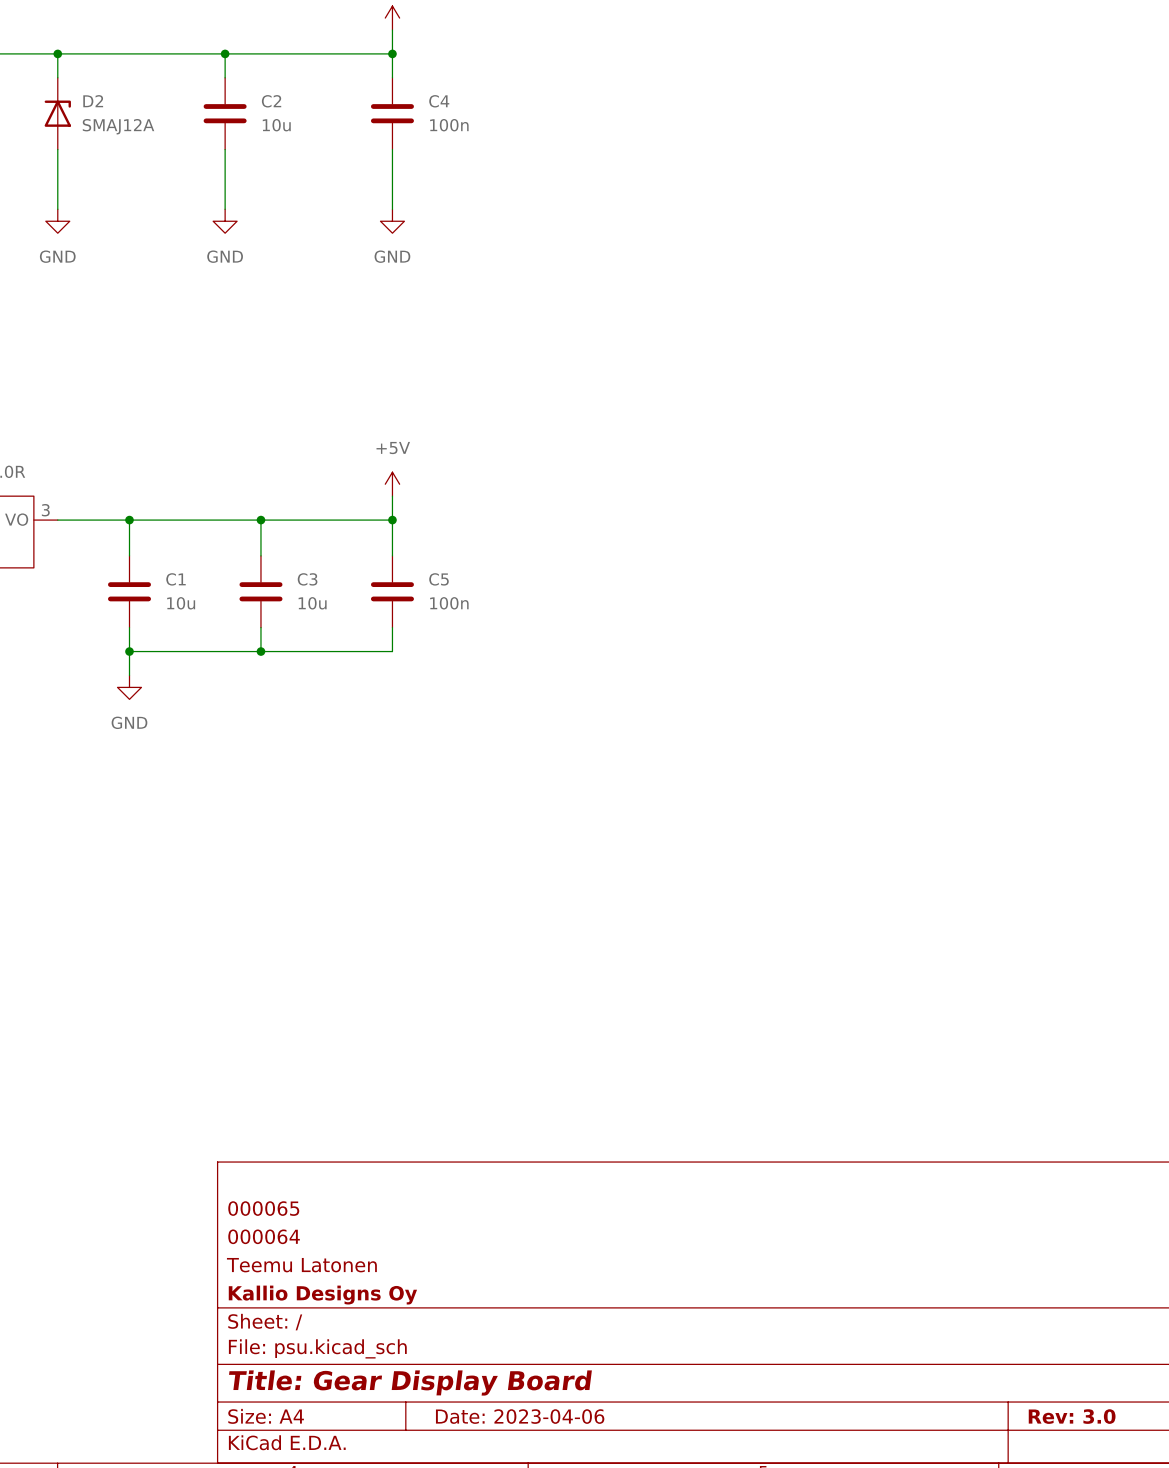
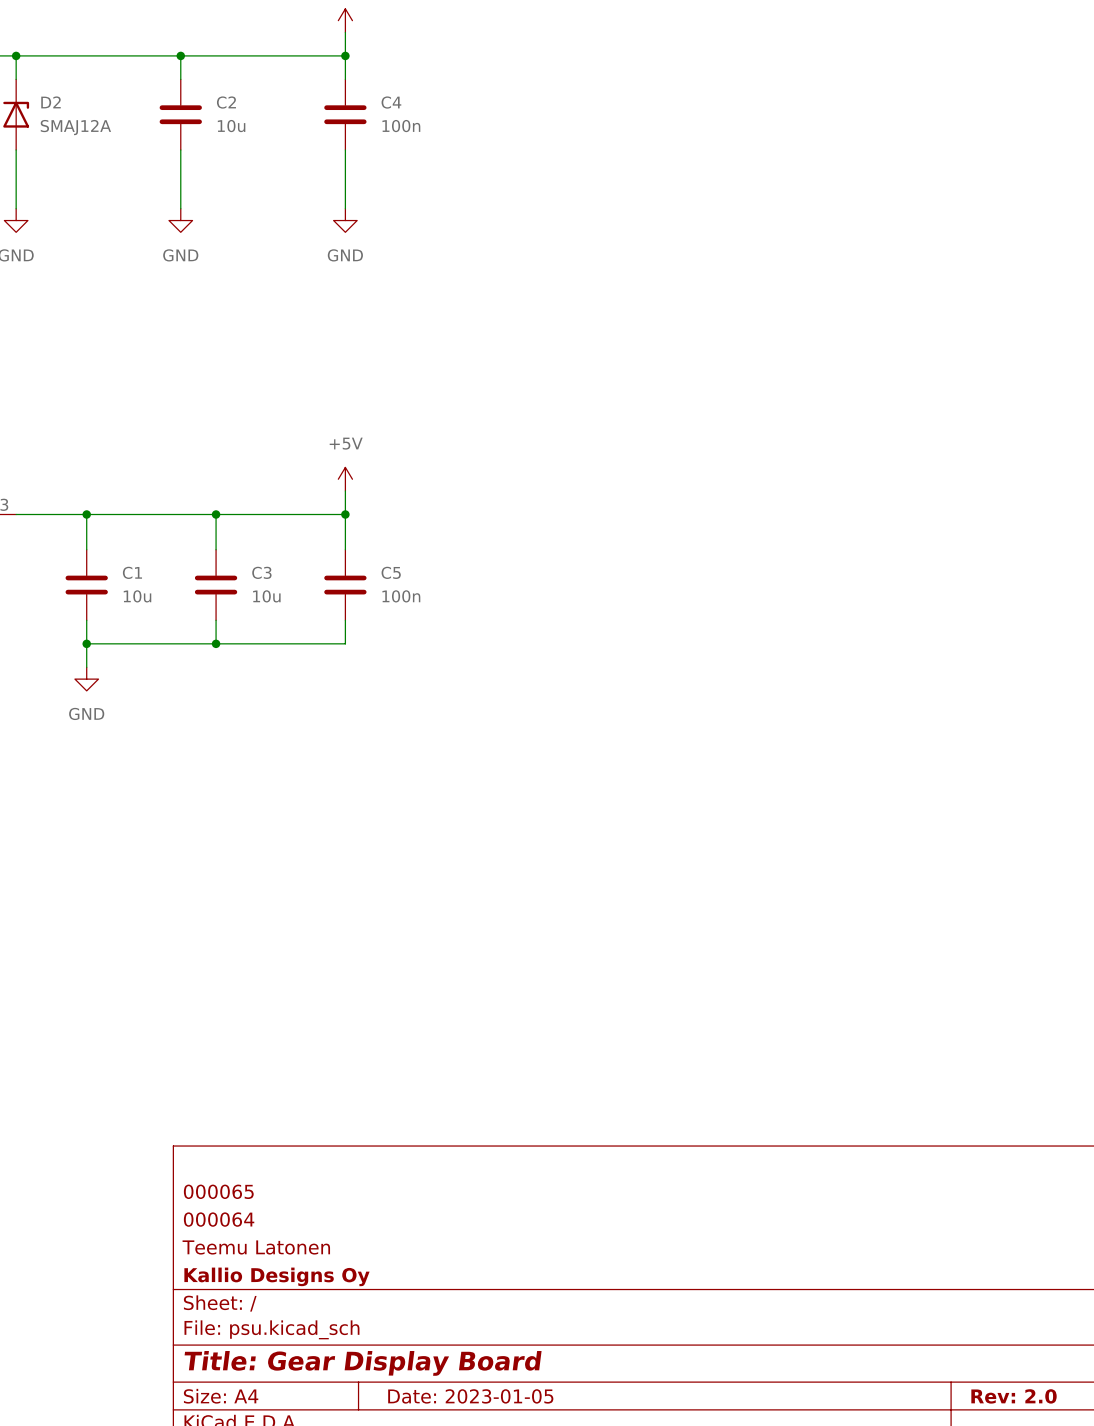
title block: Date: 2023-04-06 (520, 1416) -> Date: 2023-01-05 (470, 1396)
title block: Rev: 3.0 (1072, 1416) -> Rev: 2.0 (1014, 1396)

